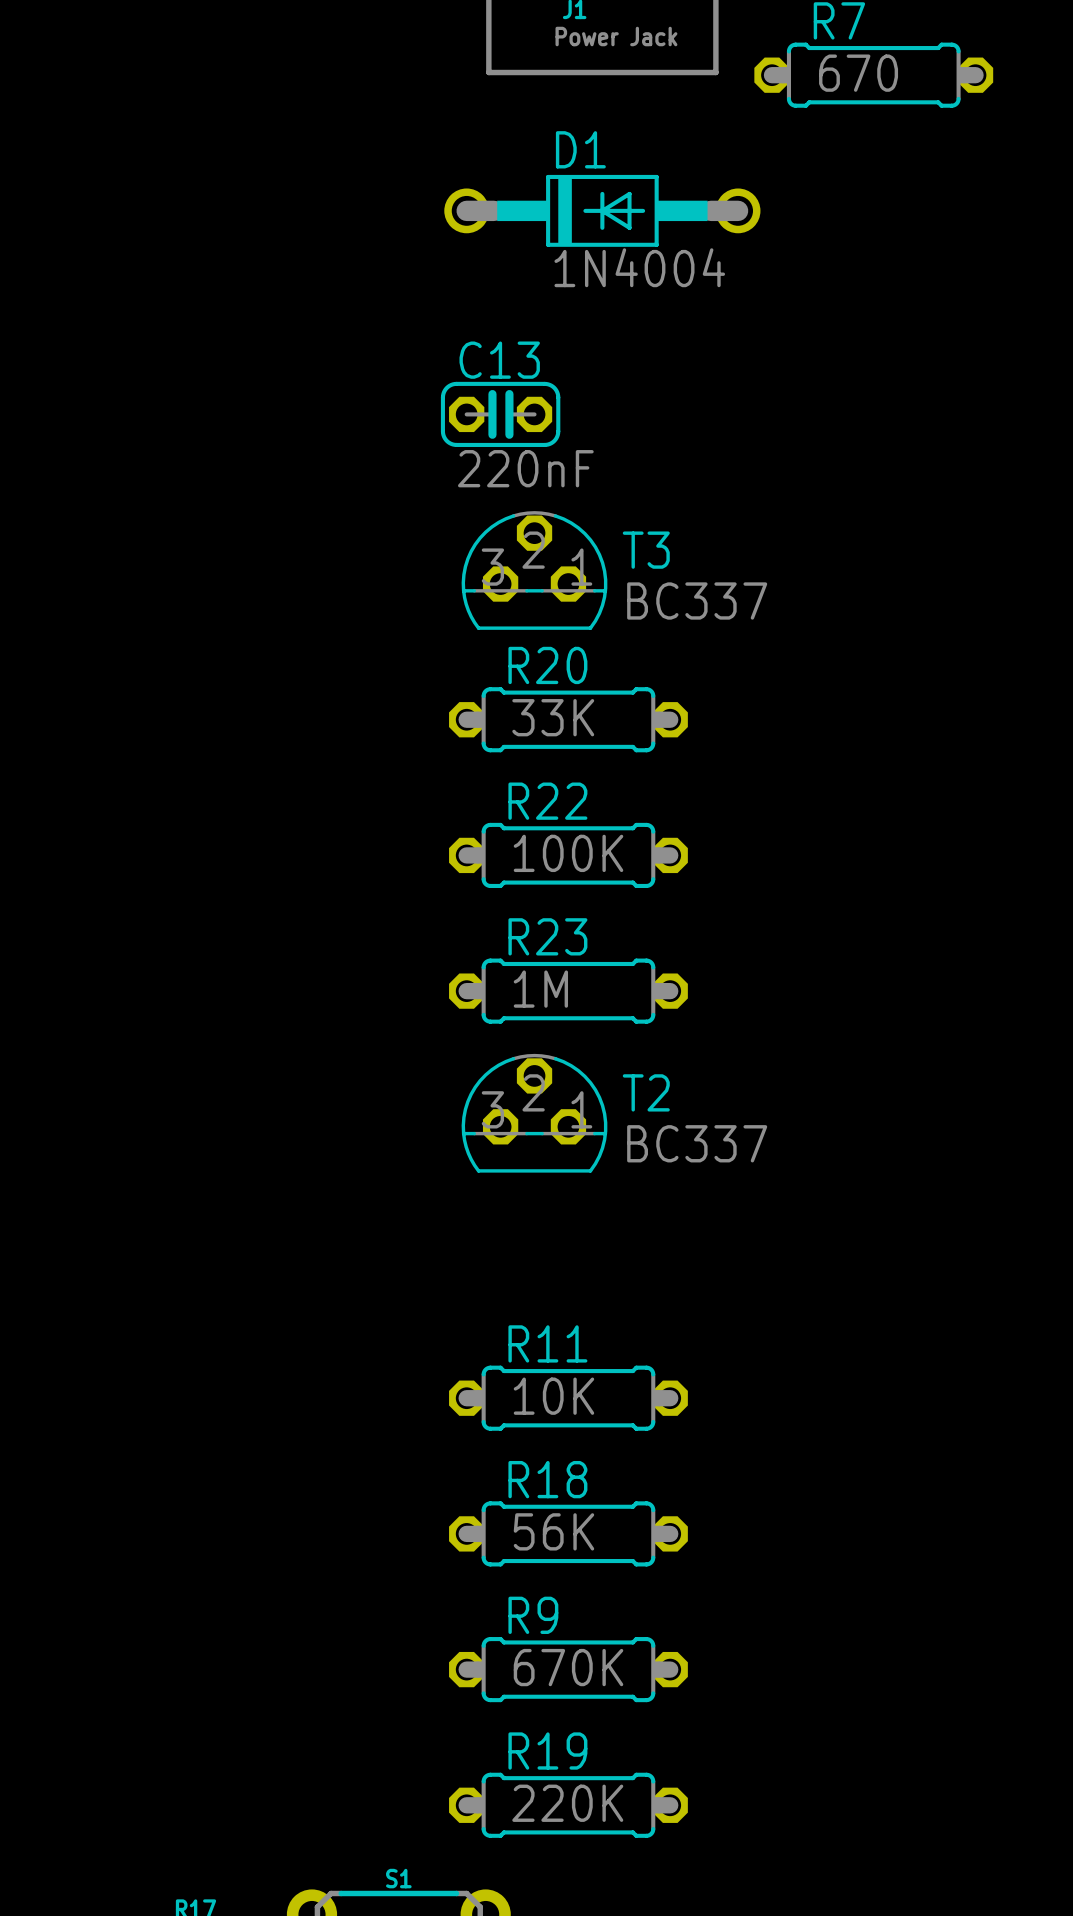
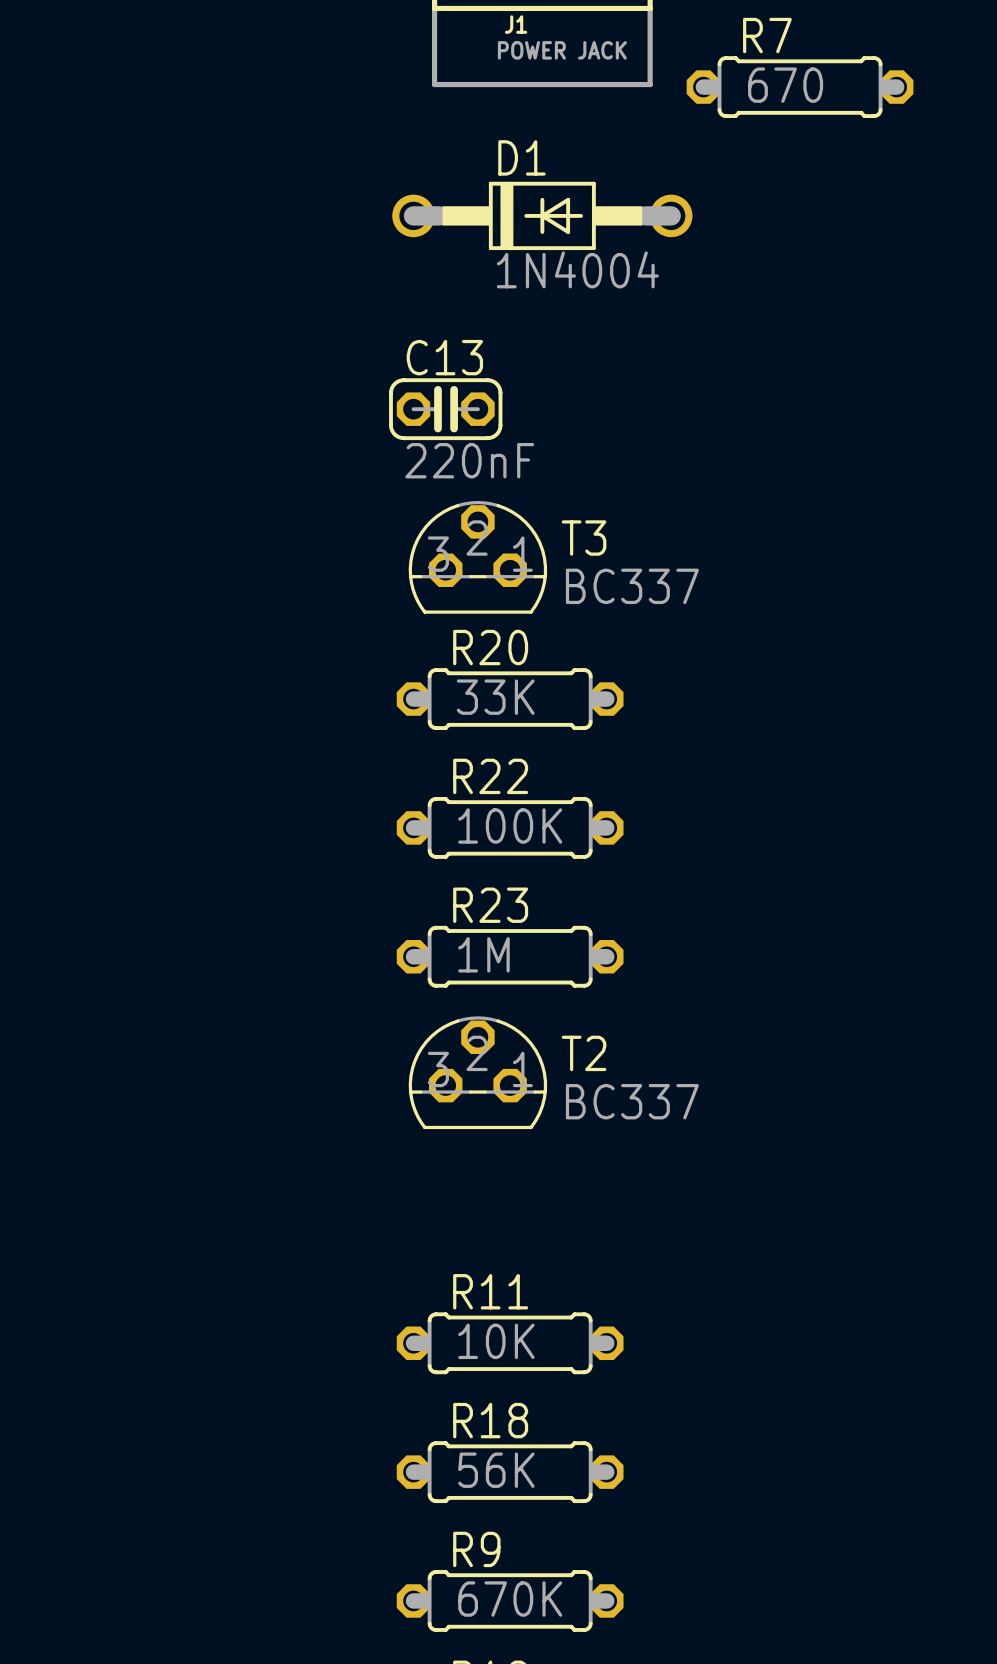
J1 value: Power Jack (616, 36) -> POWER JACK (562, 50)

